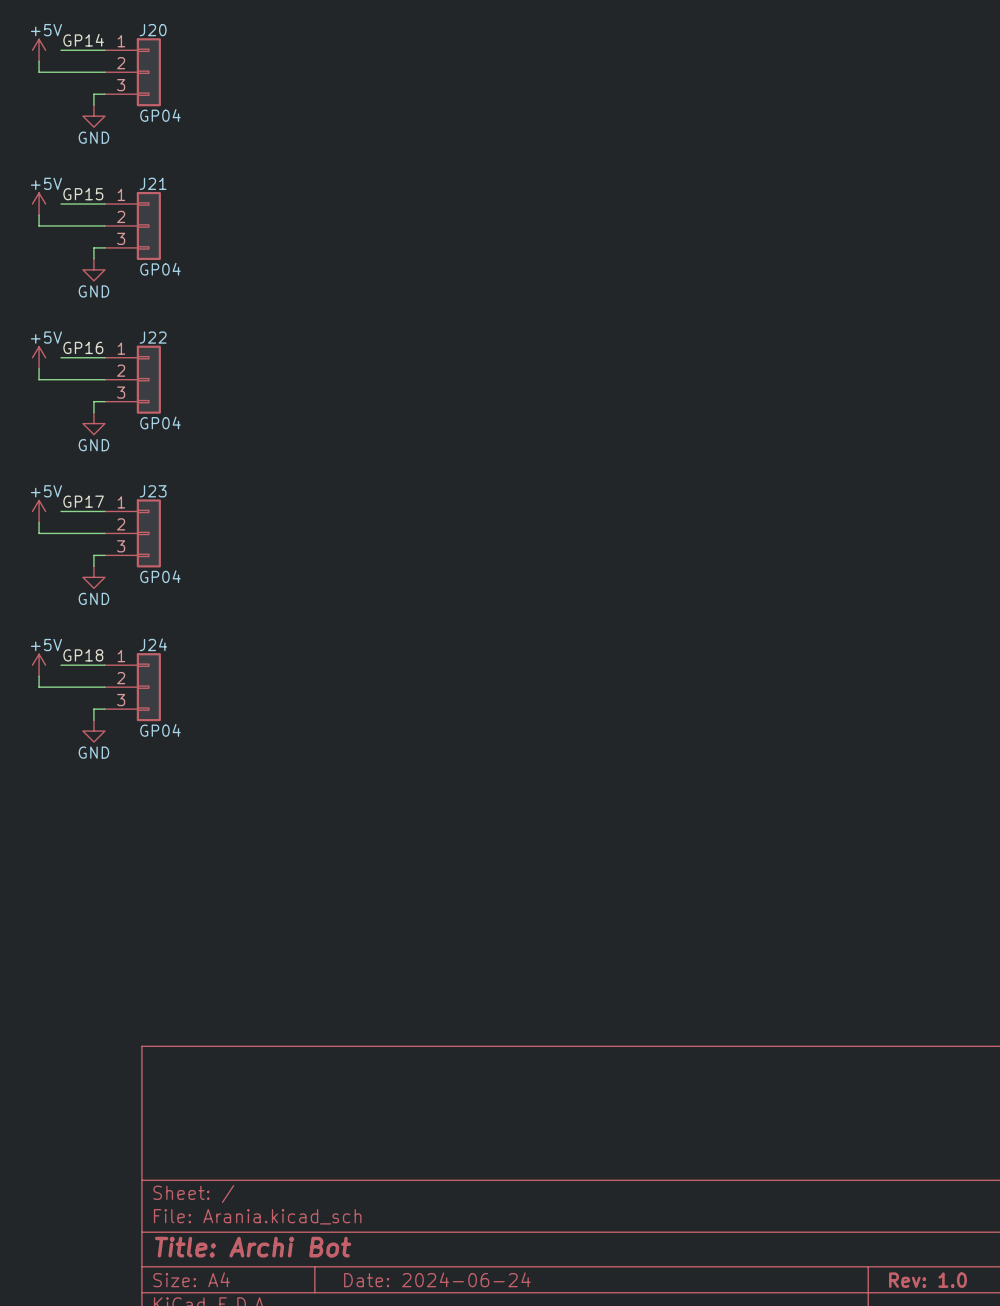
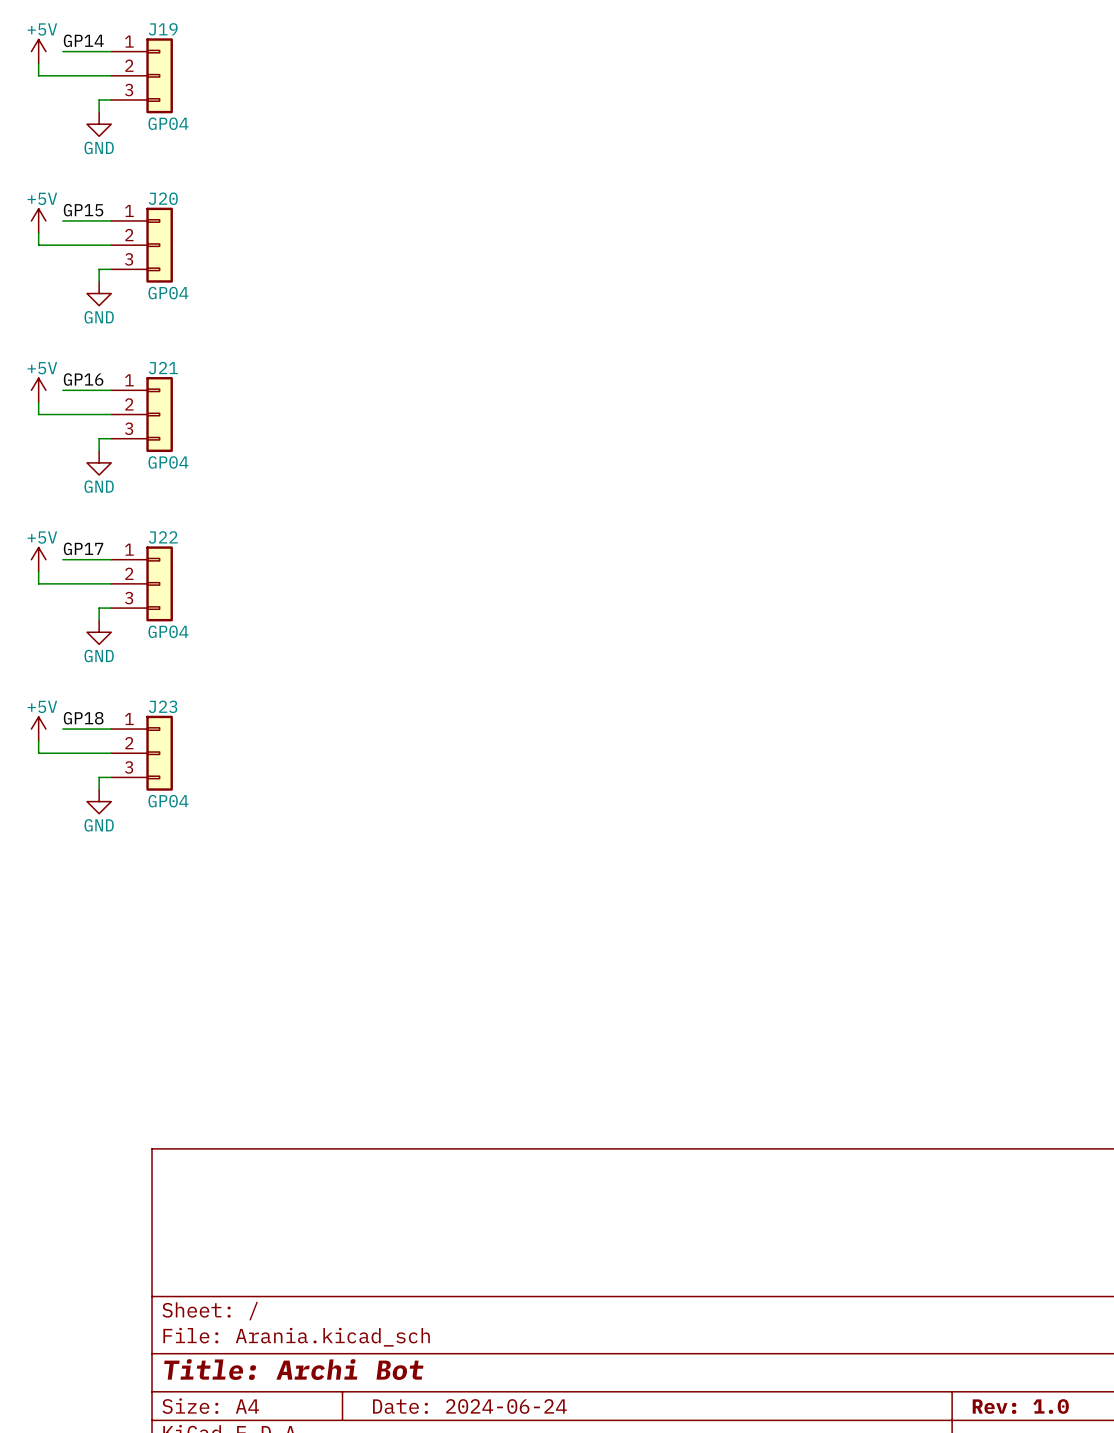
J20 name: J20 (153, 30) -> J19 (163, 29)
J21 name: J21 (153, 183) -> J20 (163, 198)
J22 name: J22 (153, 337) -> J21 (163, 368)
J23 name: J23 (153, 491) -> J22 (163, 537)
J24 name: J24 (153, 644) -> J23 (163, 706)

